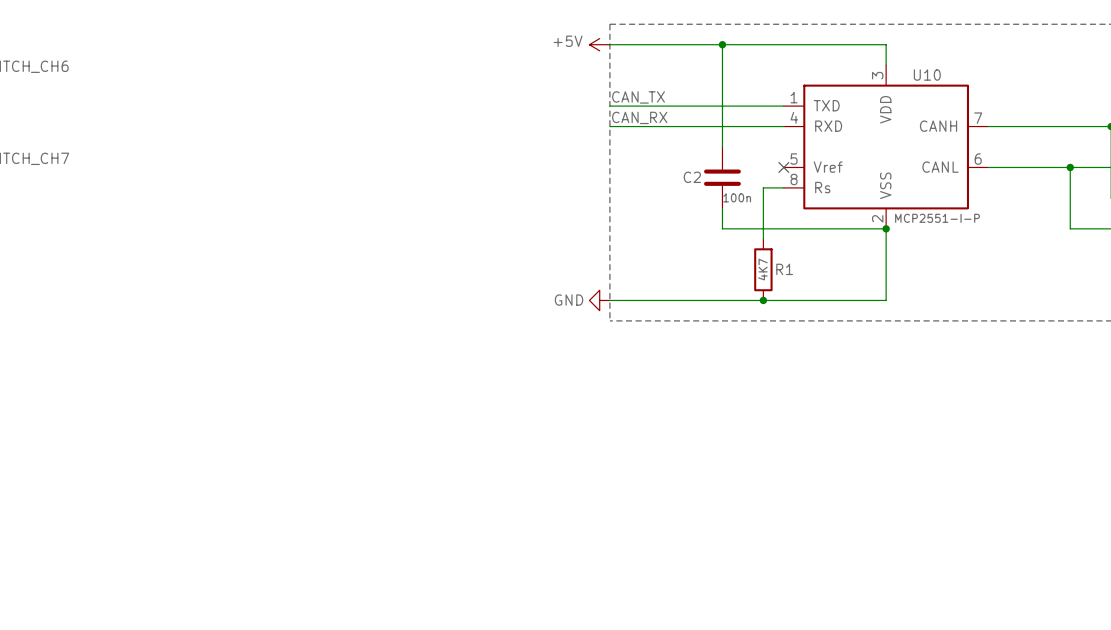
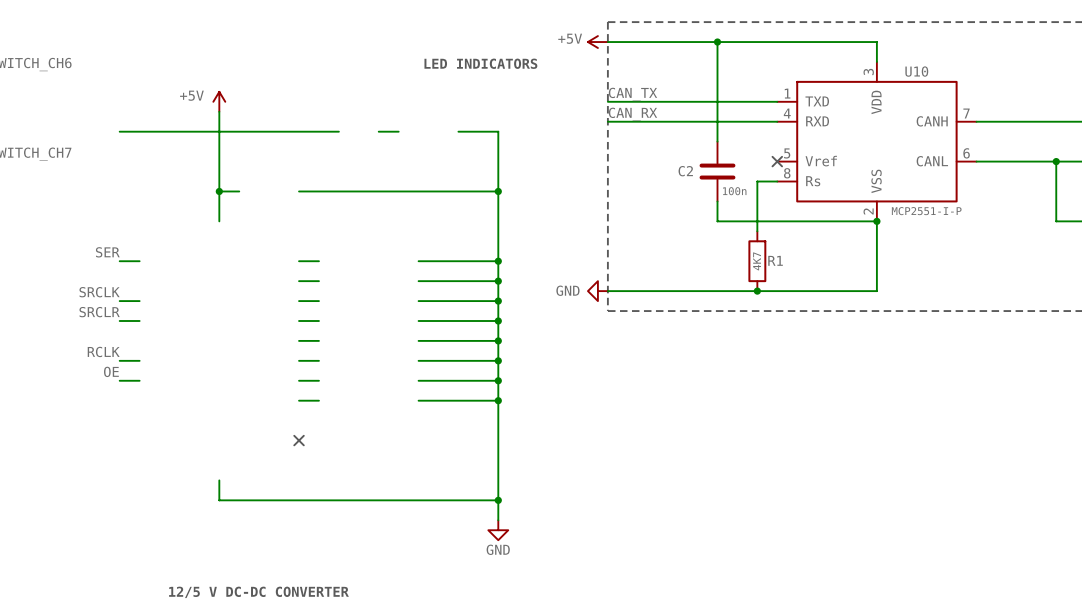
text: none -> LED INDICATORS (480, 63)
power symbol: none -> +5V (219, 101)
wire: none -> (219, 111) (219, 221)
wire: none -> (119, 131) (338, 131)
wire: none -> (378, 131) (398, 131)
wire: none -> (458, 131) (498, 131) (498, 520)
wire: none -> (219, 191) (239, 191)
junction: none -> (219, 191)
wire: none -> (299, 191) (498, 191)
junction: none -> (498, 191)
label: none -> SER (107, 252)
wire: none -> (119, 261) (139, 261)
wire: none -> (299, 261) (318, 261)
wire: none -> (418, 261) (498, 261)
junction: none -> (498, 261)
wire: none -> (299, 281) (318, 281)
wire: none -> (418, 281) (498, 281)
junction: none -> (498, 281)
label: none -> SRCLK (99, 292)
wire: none -> (119, 301) (139, 301)
wire: none -> (299, 301) (318, 301)
wire: none -> (418, 301) (498, 301)
junction: none -> (498, 301)
label: none -> SRCLR (99, 312)
wire: none -> (119, 321) (139, 321)
wire: none -> (299, 321) (318, 321)
wire: none -> (418, 321) (498, 321)
junction: none -> (498, 321)
wire: none -> (299, 340) (318, 340)
wire: none -> (418, 340) (498, 340)
junction: none -> (498, 340)
label: none -> RCLK (103, 351)
wire: none -> (119, 360) (139, 360)
wire: none -> (299, 360) (318, 360)
wire: none -> (418, 360) (498, 360)
junction: none -> (498, 360)
label: none -> OE (111, 371)
wire: none -> (119, 380) (139, 380)
wire: none -> (299, 380) (318, 380)
wire: none -> (418, 380) (498, 380)
junction: none -> (498, 380)
wire: none -> (299, 400) (318, 400)
wire: none -> (418, 400) (498, 400)
junction: none -> (498, 400)
no-connect mark: none -> (299, 440)
wire: none -> (219, 480) (219, 500) (498, 500)
junction: none -> (498, 500)
power symbol: none -> GND (498, 530)
text: none -> 12/5 V DC-DC CONVERTER (258, 592)

